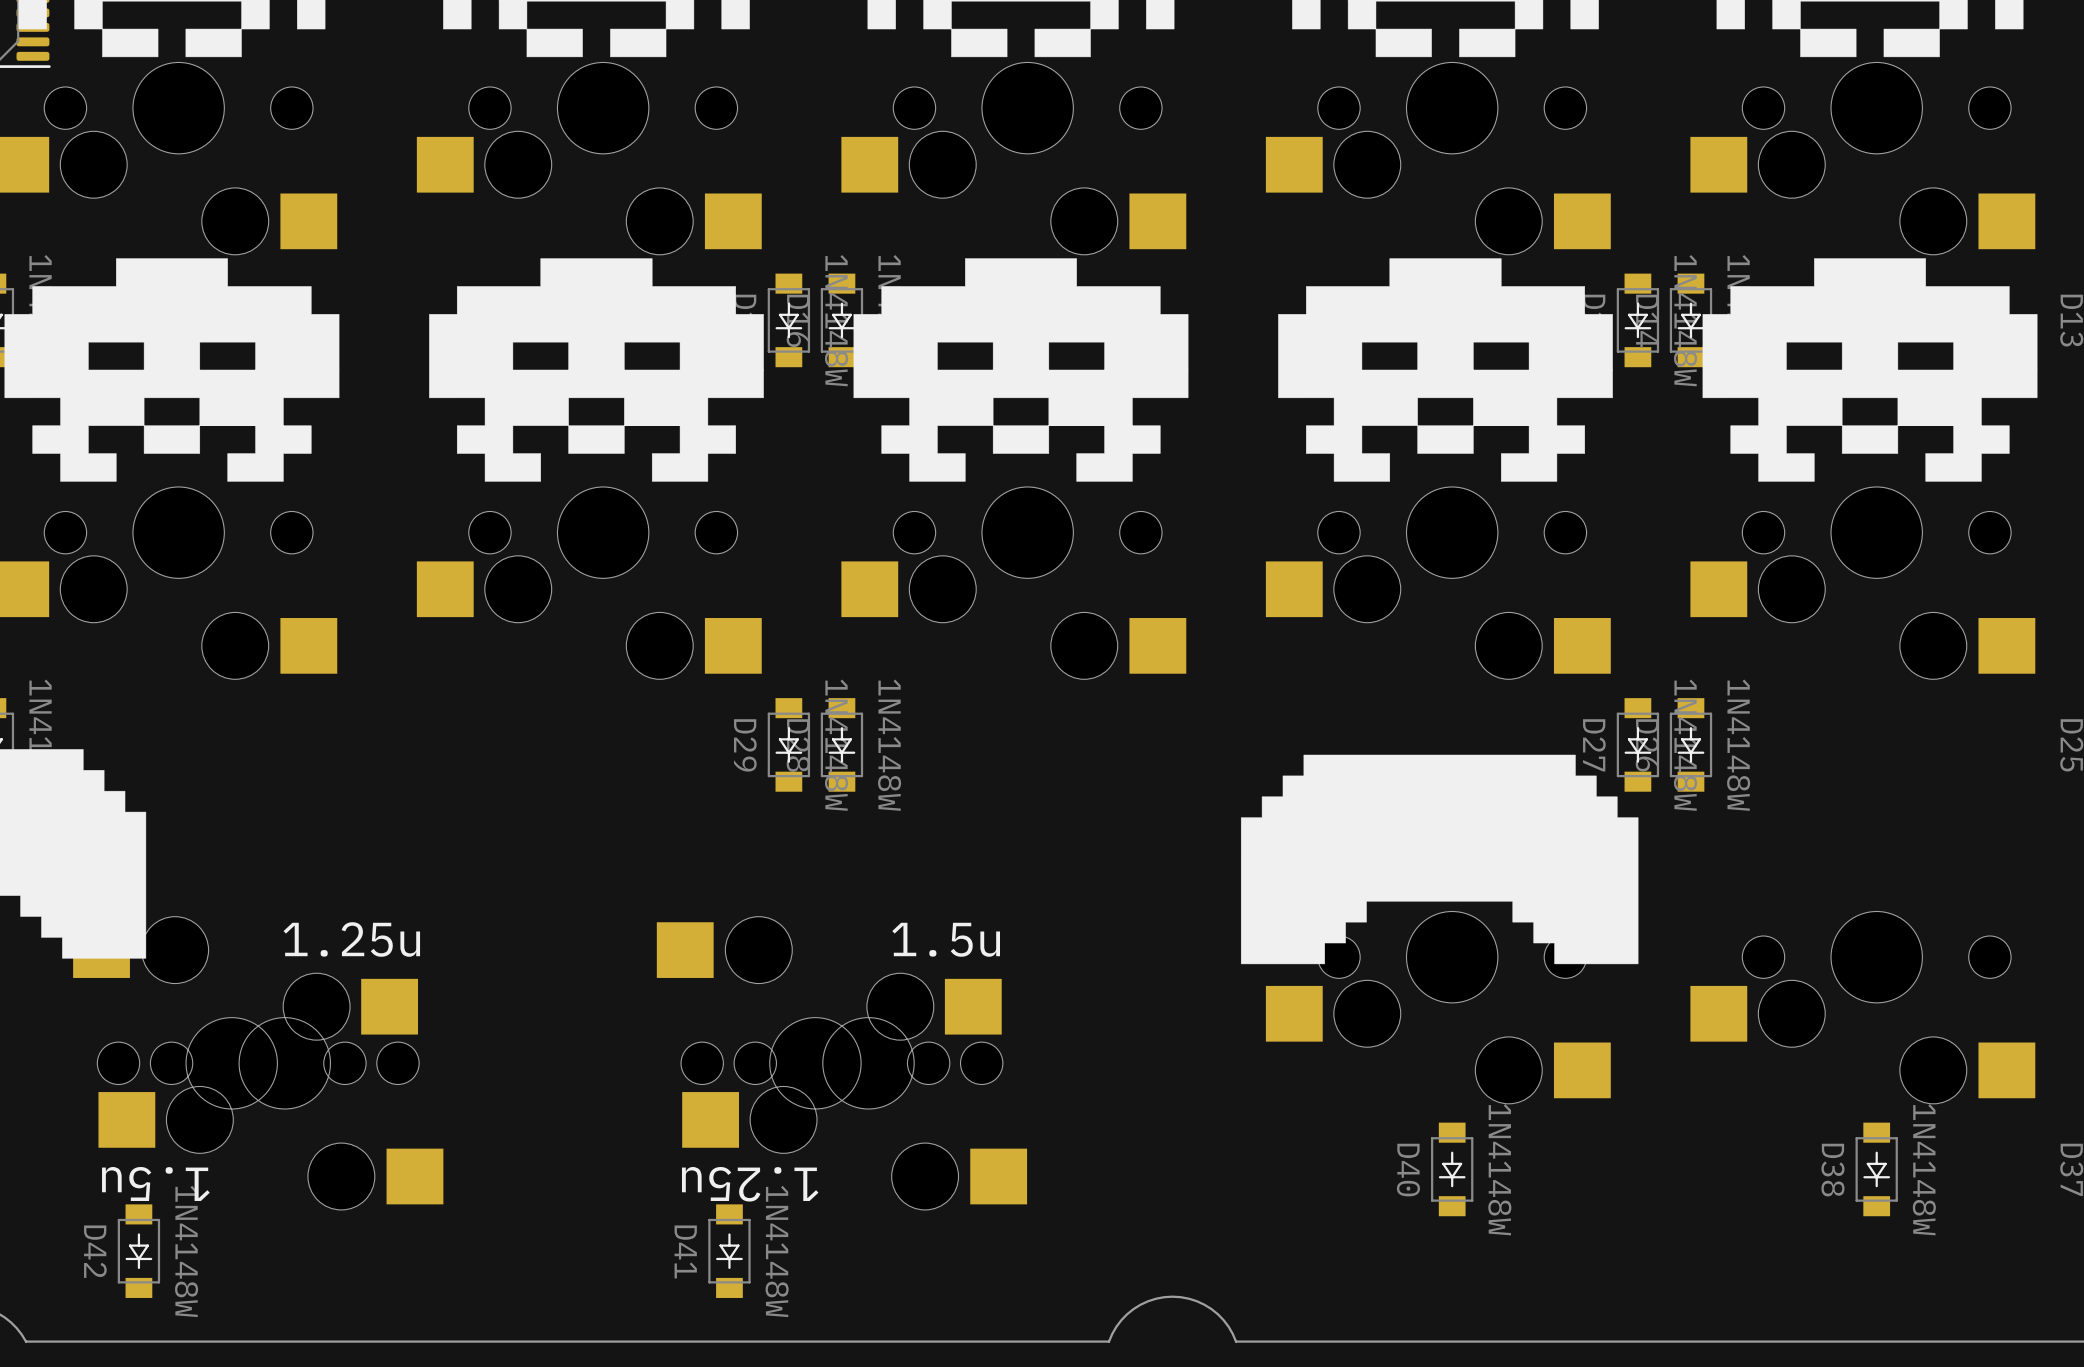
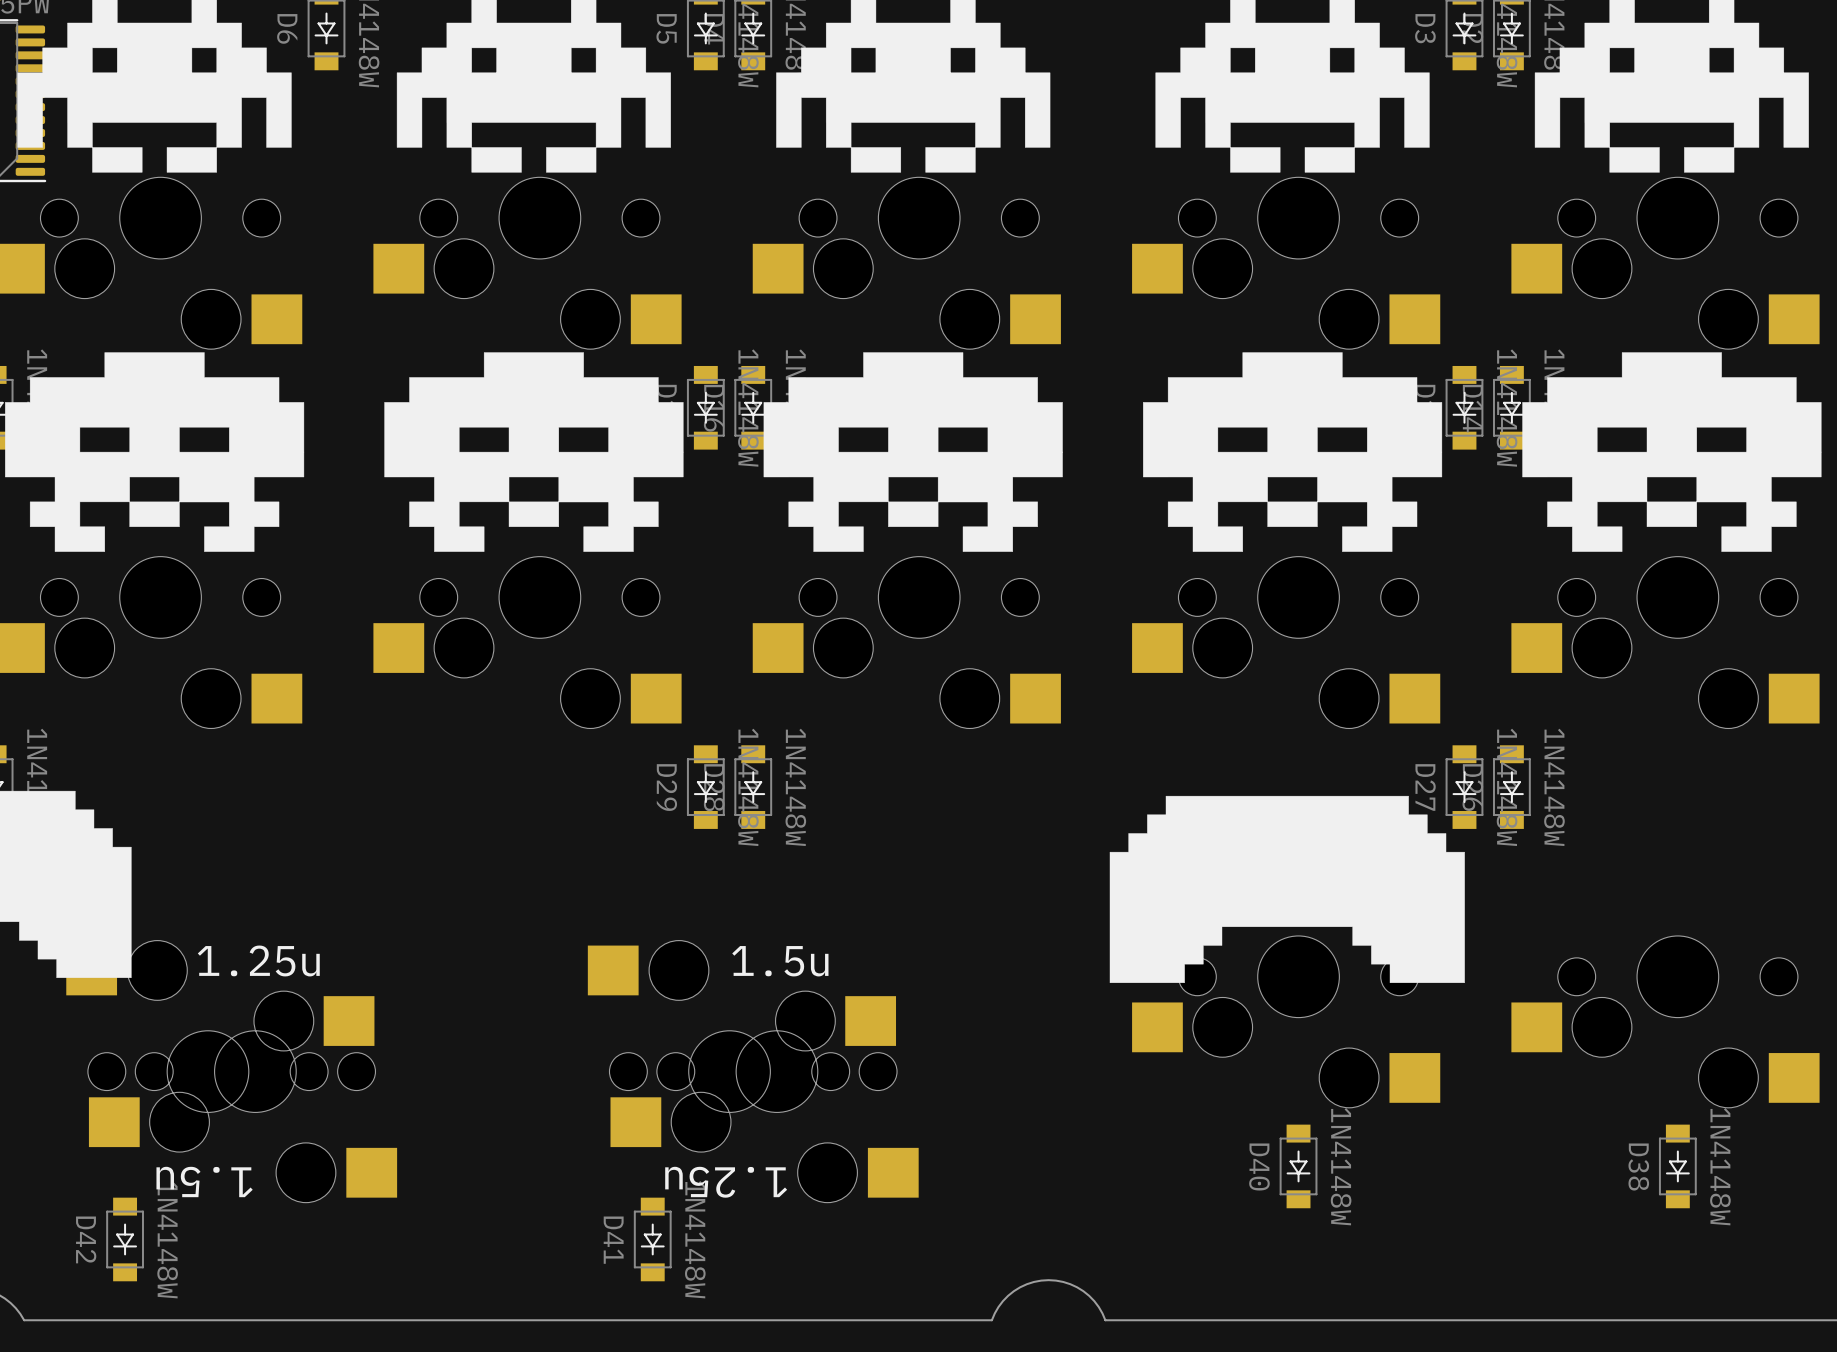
part text position: 1.25u (351, 939) -> 1.25u (258, 960)
part text position: 1.5u (946, 939) -> 1.5u (780, 961)
part text position: 1.5u (155, 1183) -> 1.5u (204, 1181)
part text position: 1.25u (750, 1184) -> 1.25u (726, 1182)

